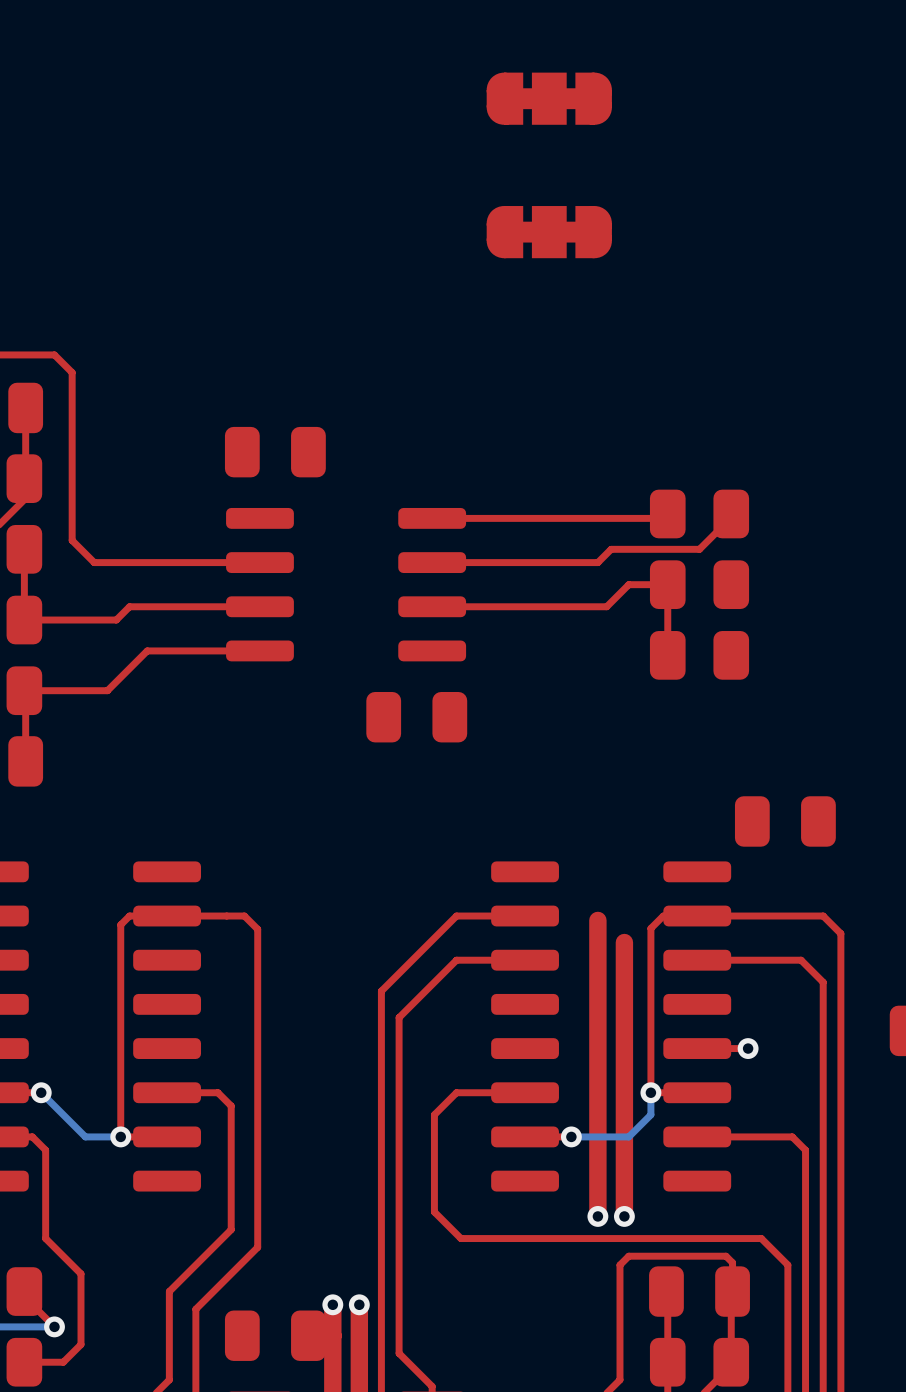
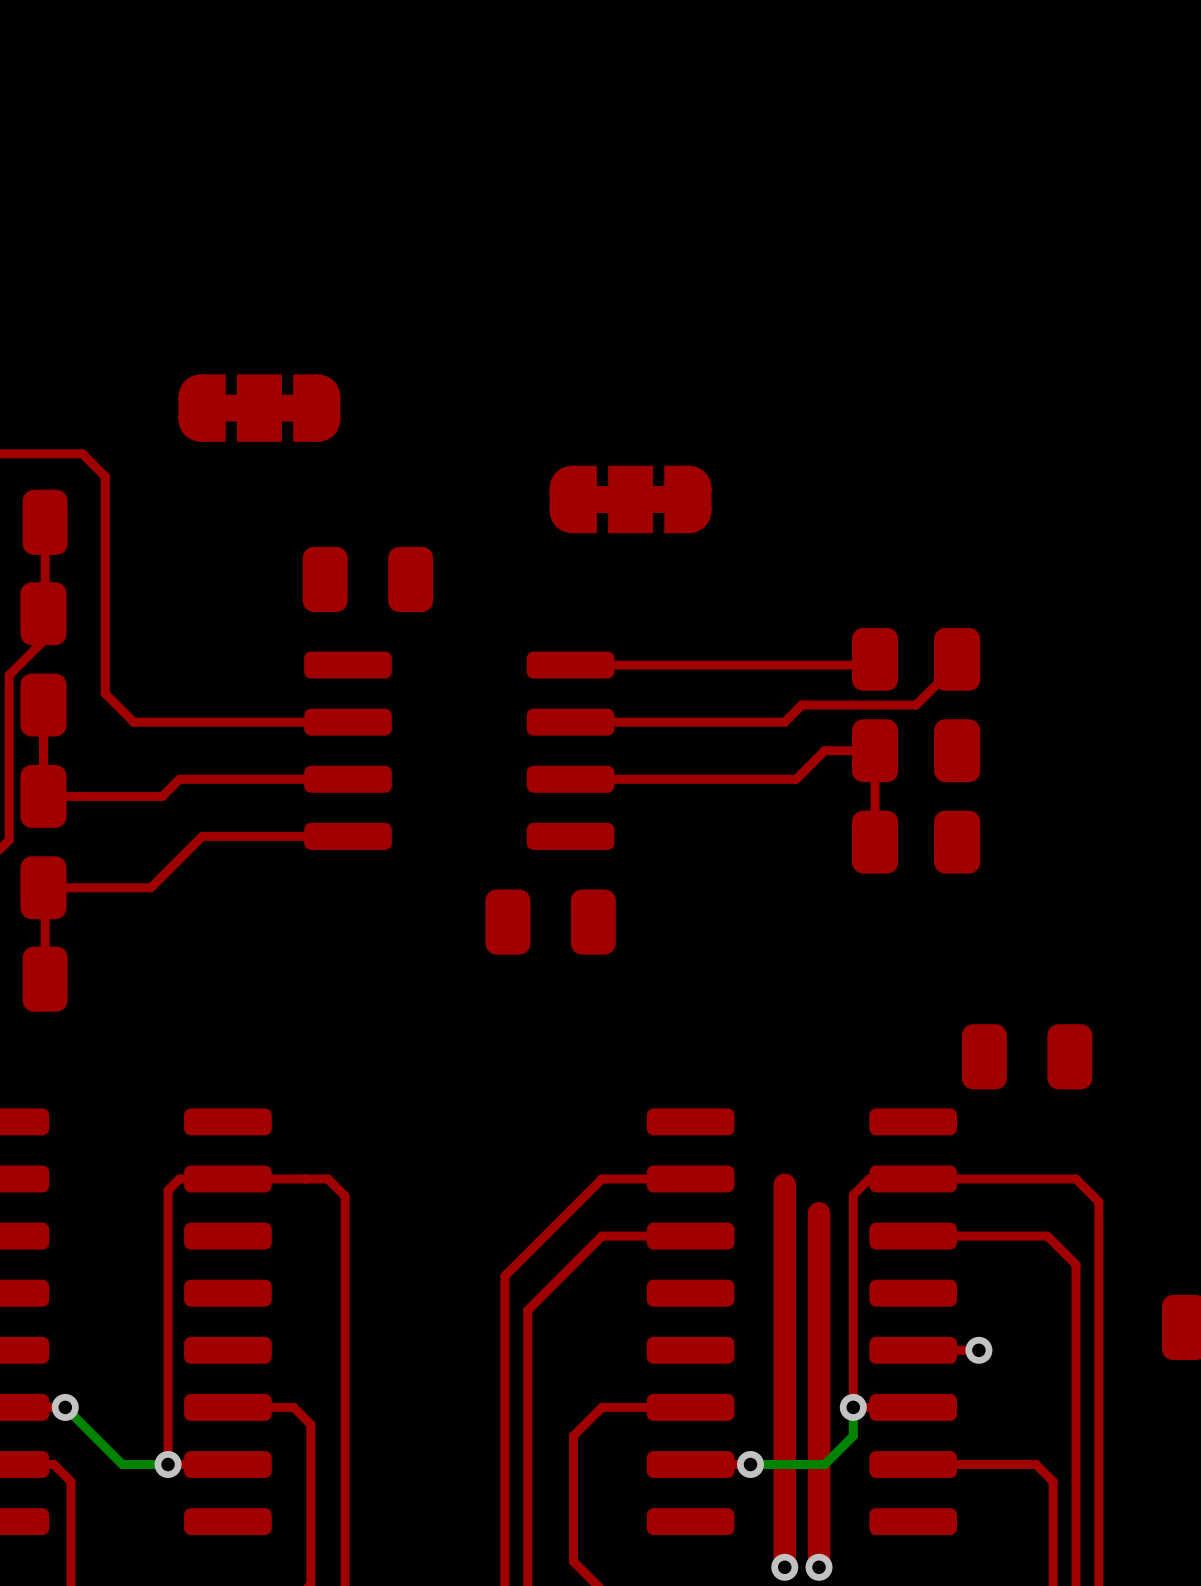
part: (549, 98) -> none
part: (549, 232) -> none
part: none -> (259, 408)
part: none -> (630, 499)

